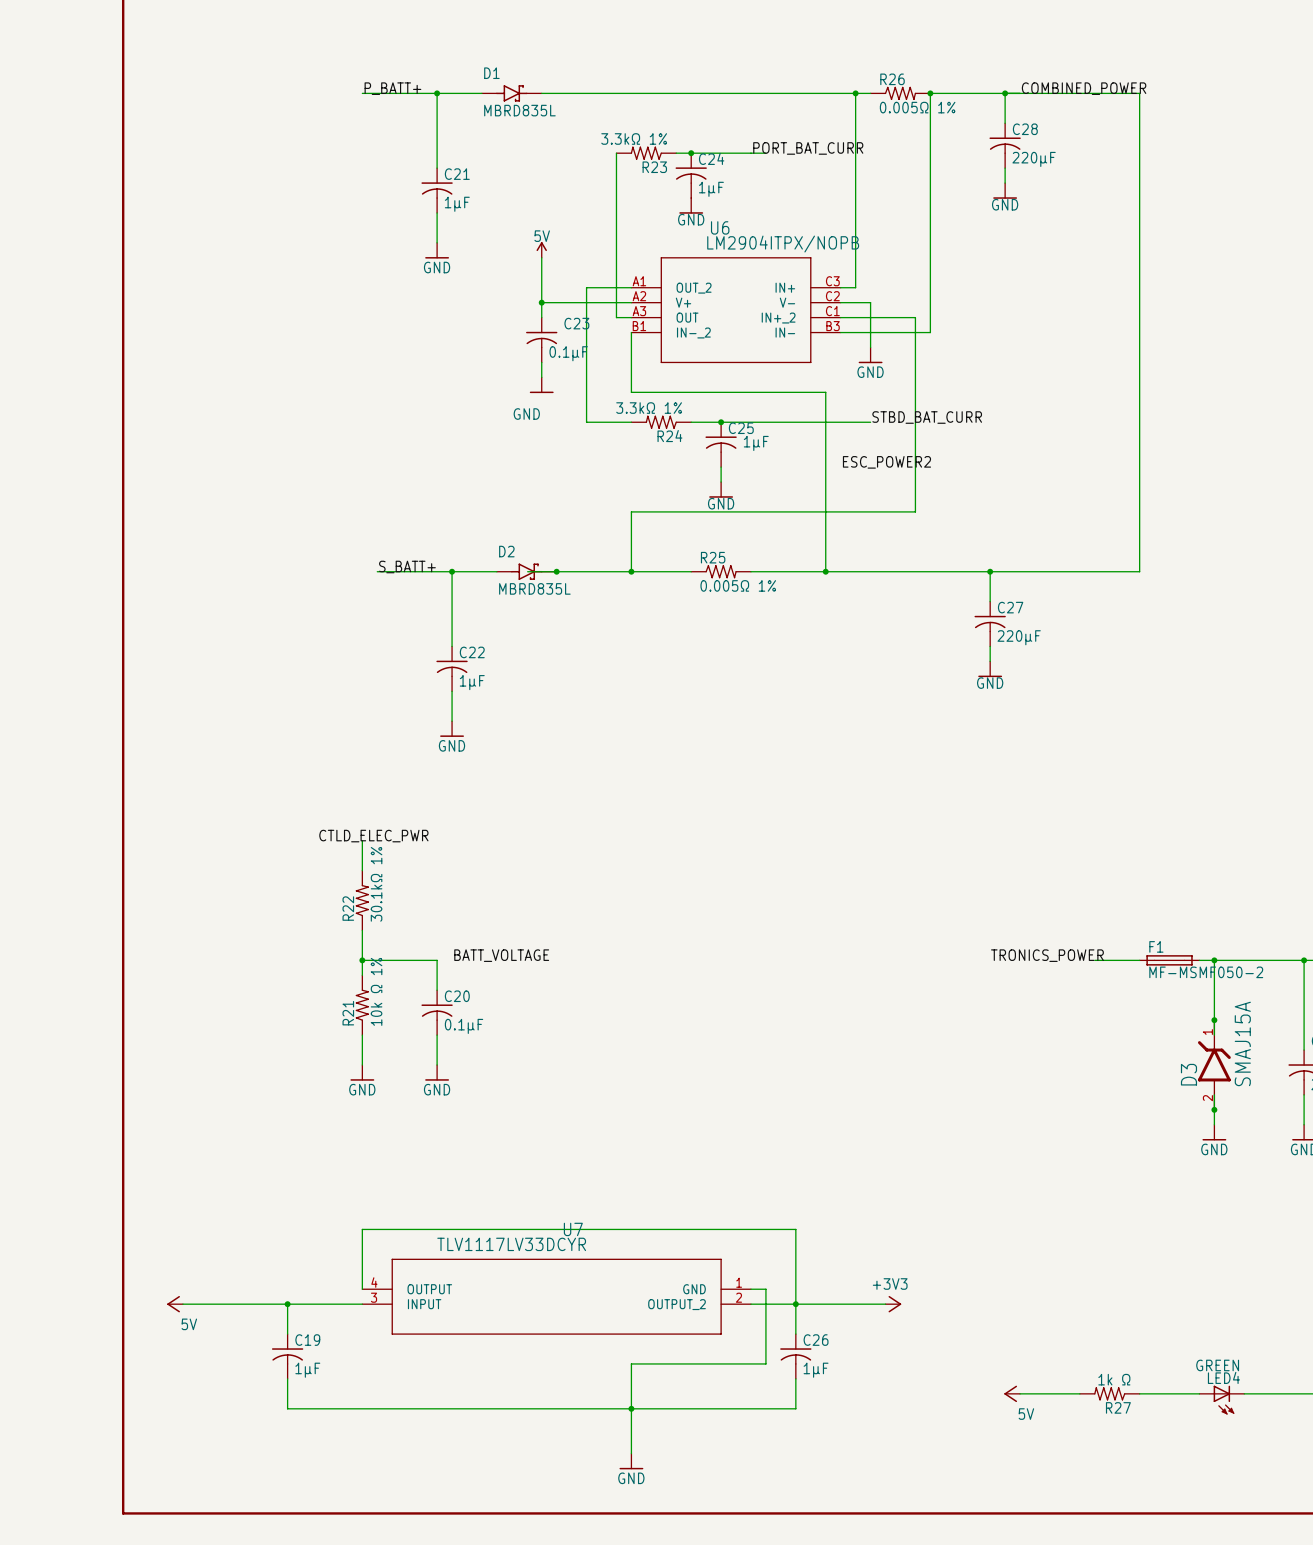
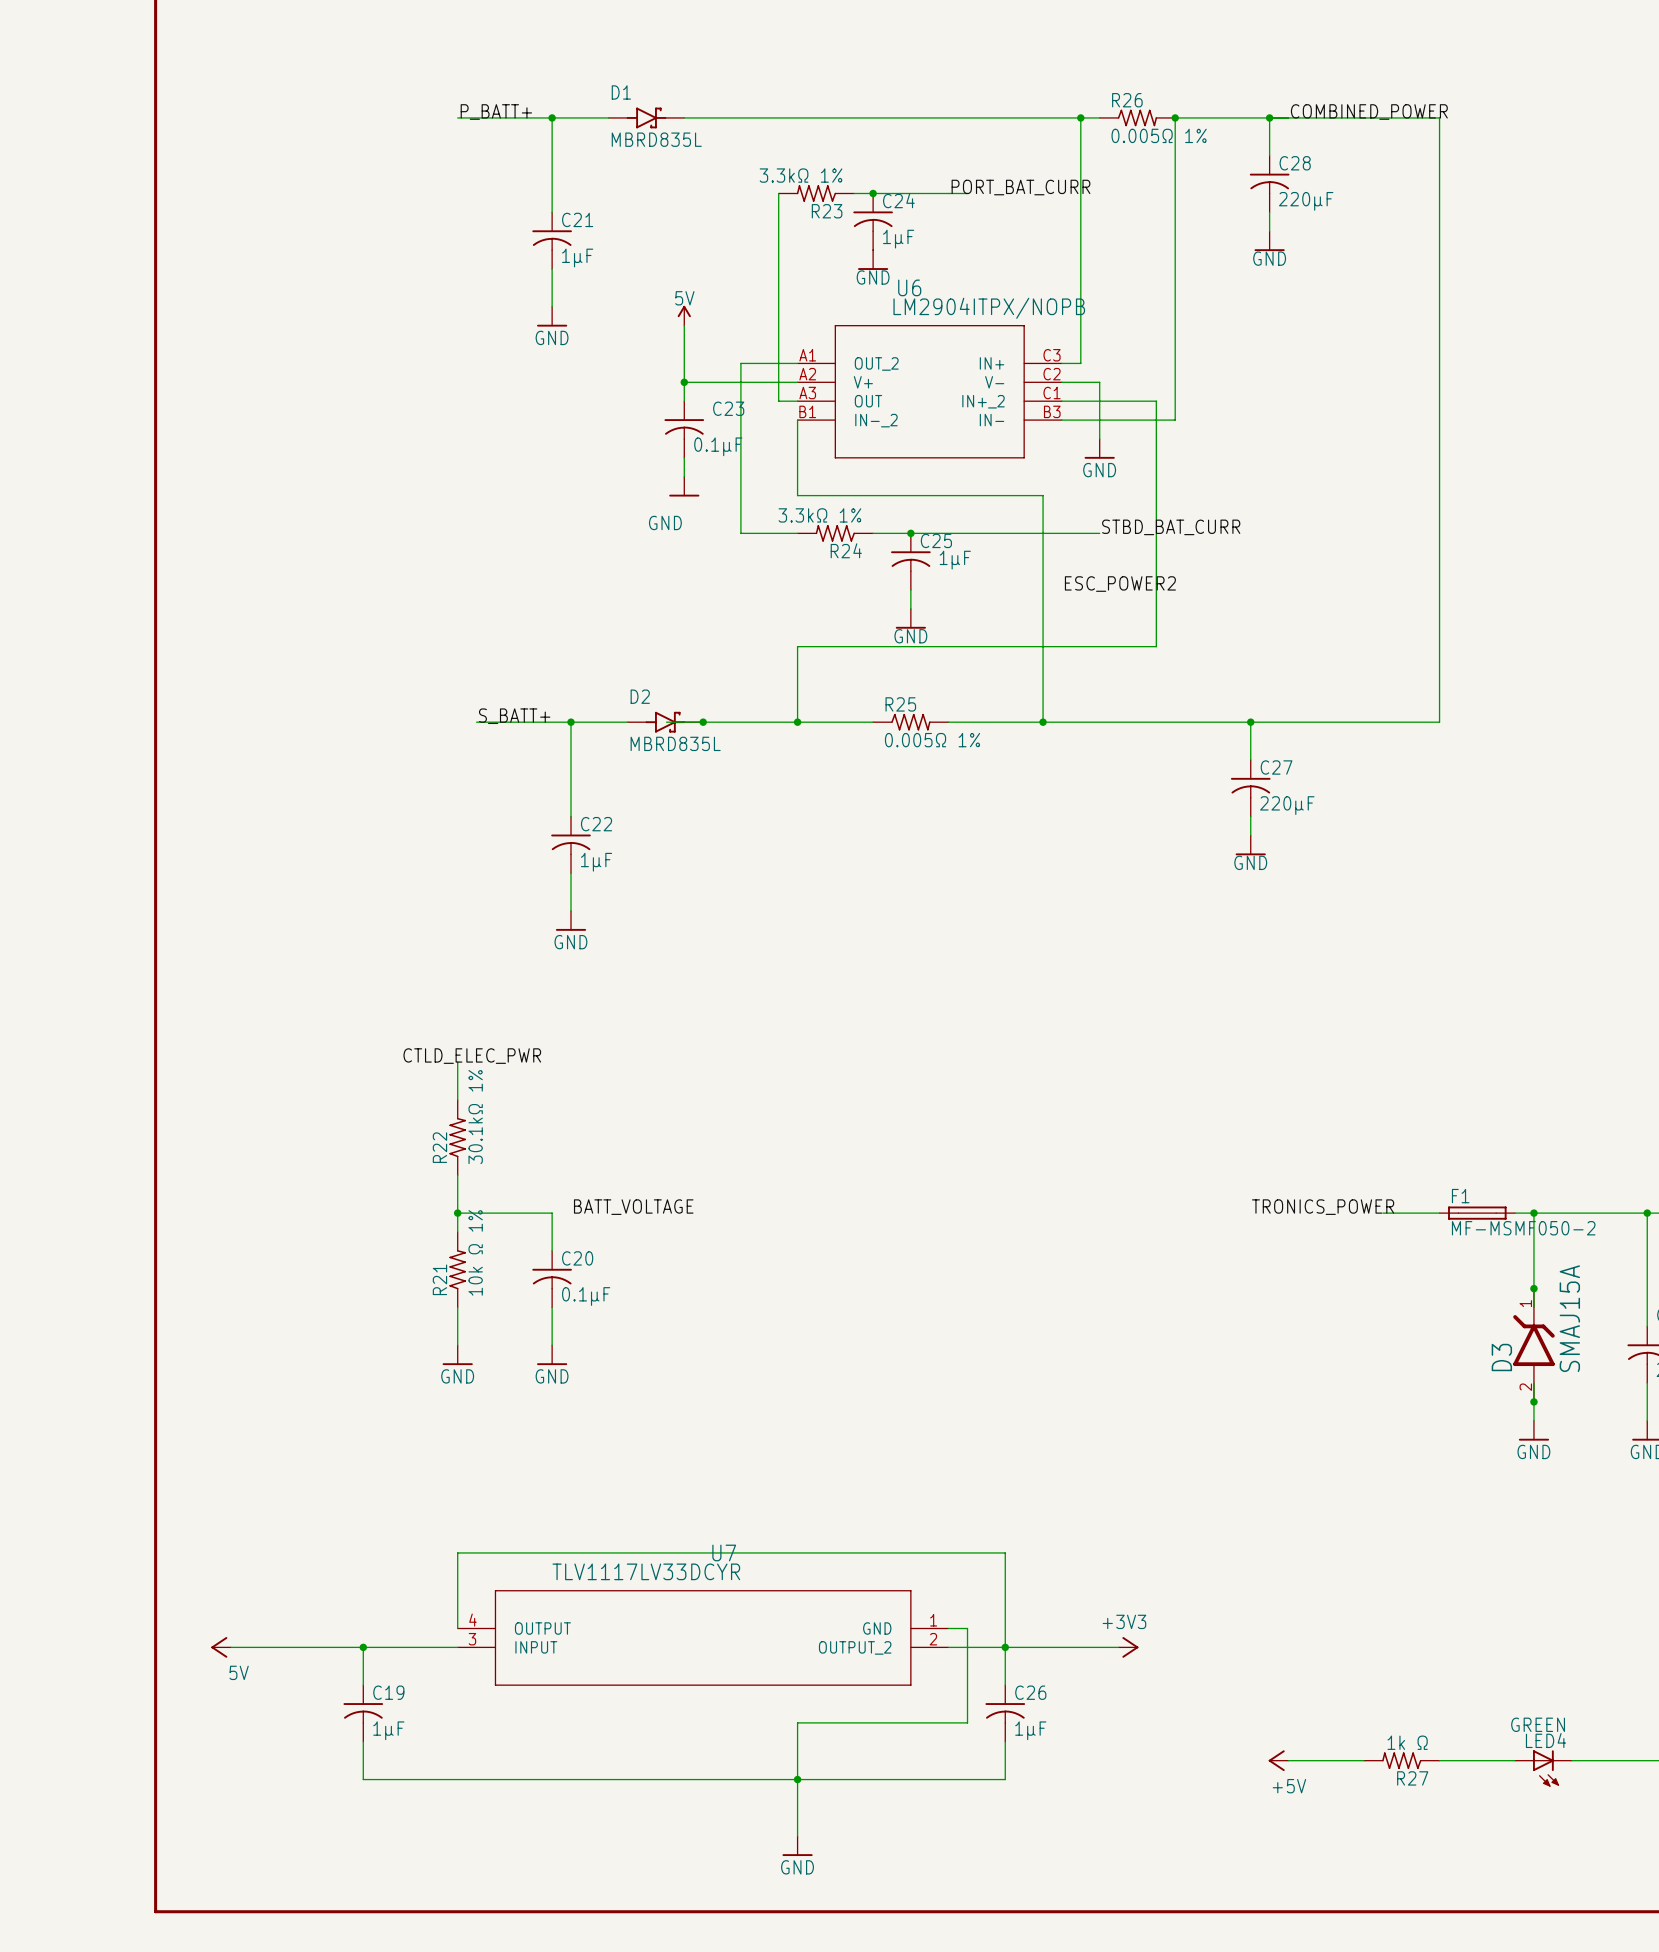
power symbol: 5V (1012, 1393) -> +5V (1278, 1760)

